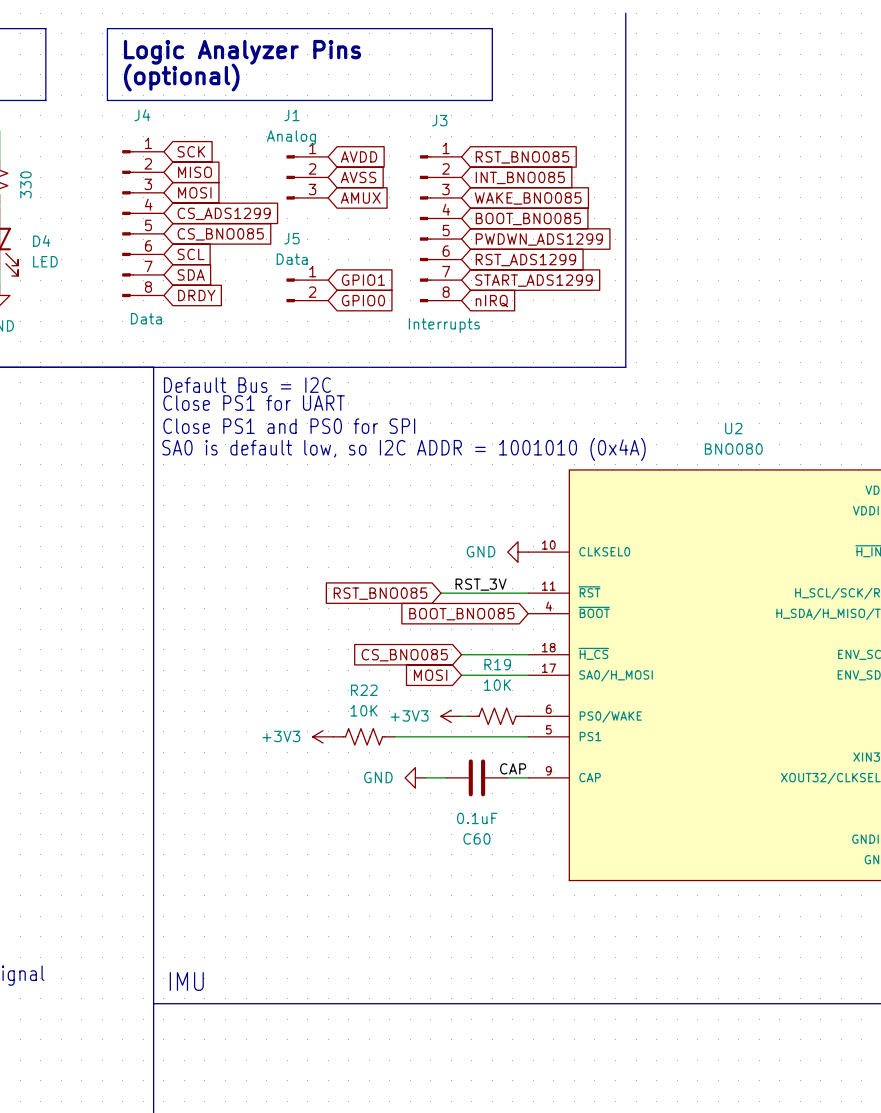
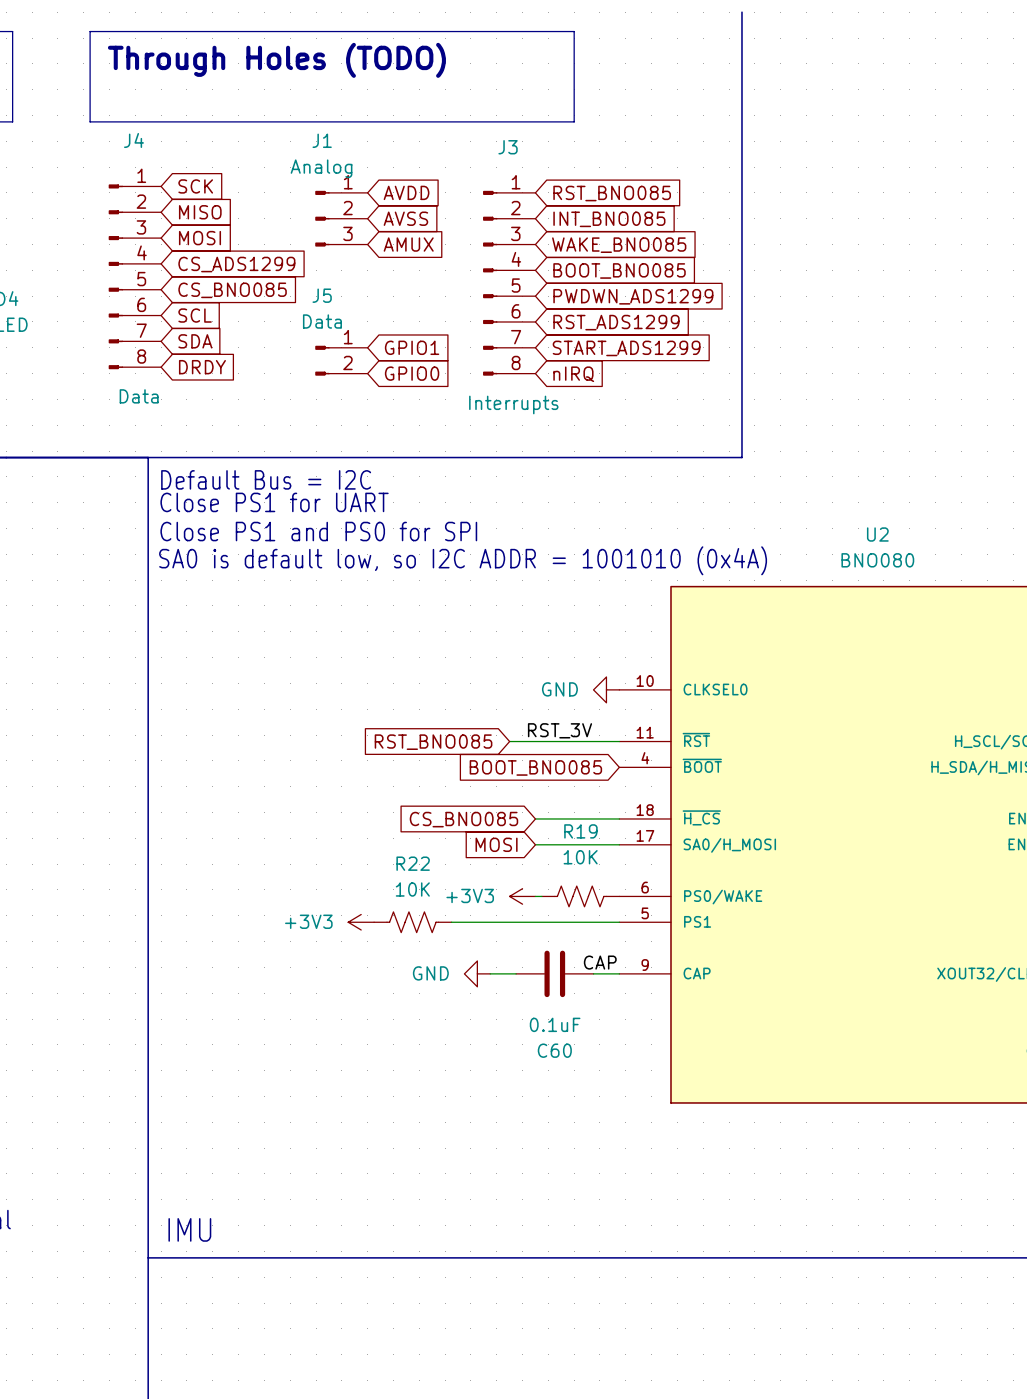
text: Logic Analyzer Pins (242, 52) -> Through Holes (TODO) (276, 60)
text: (optional) (181, 77) -> none

